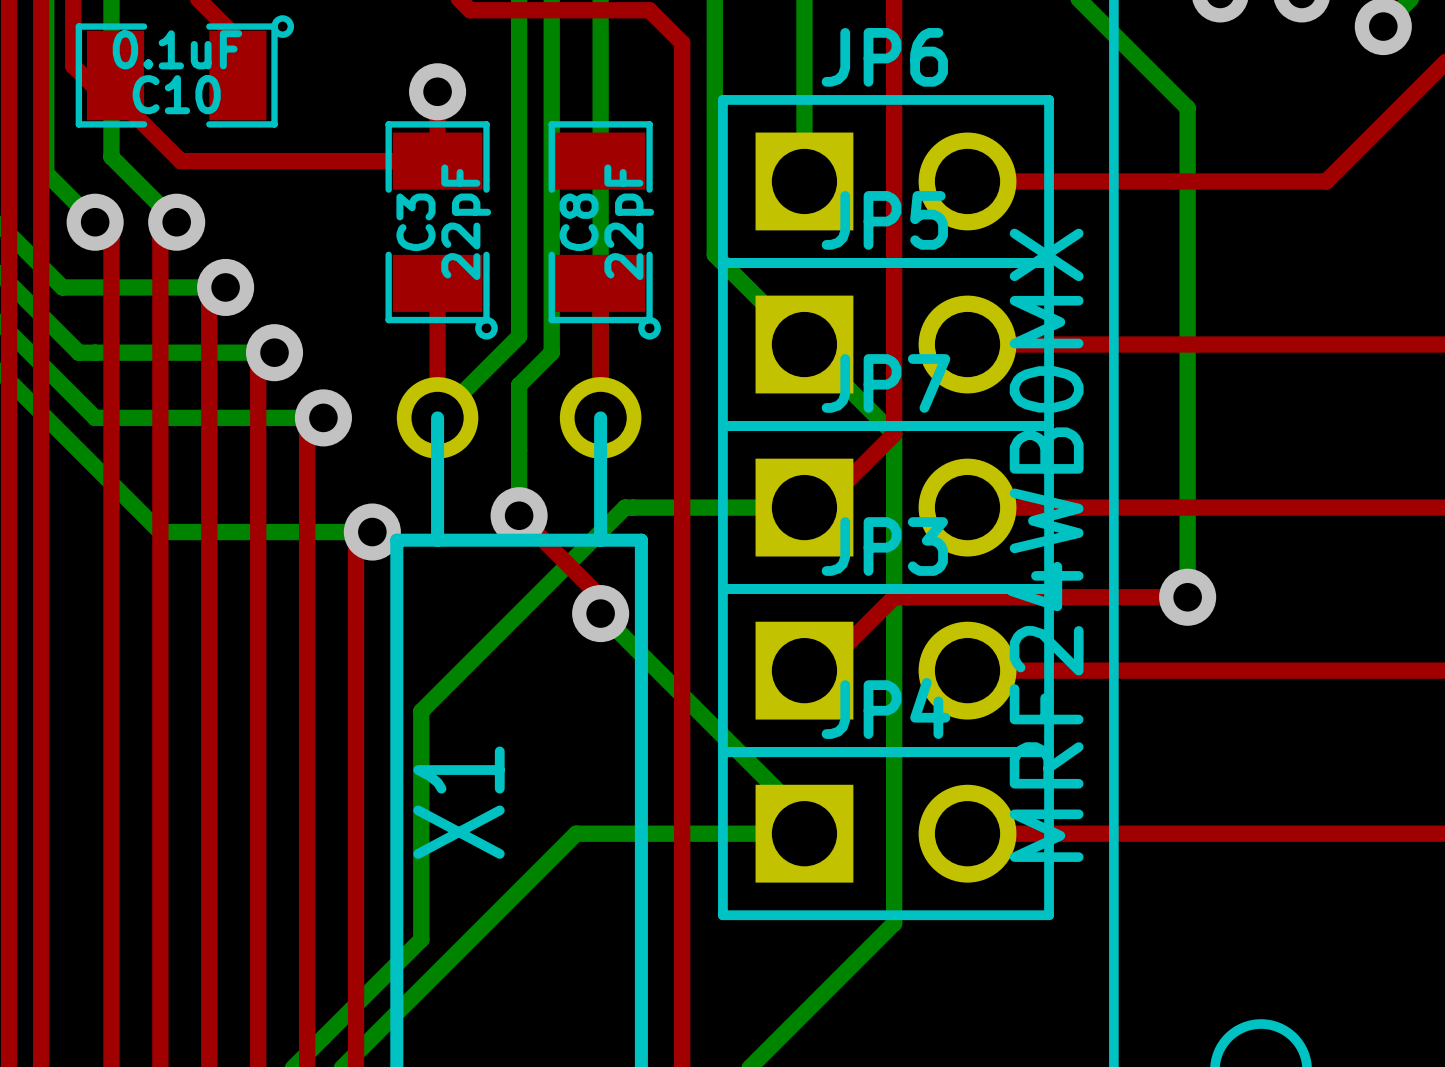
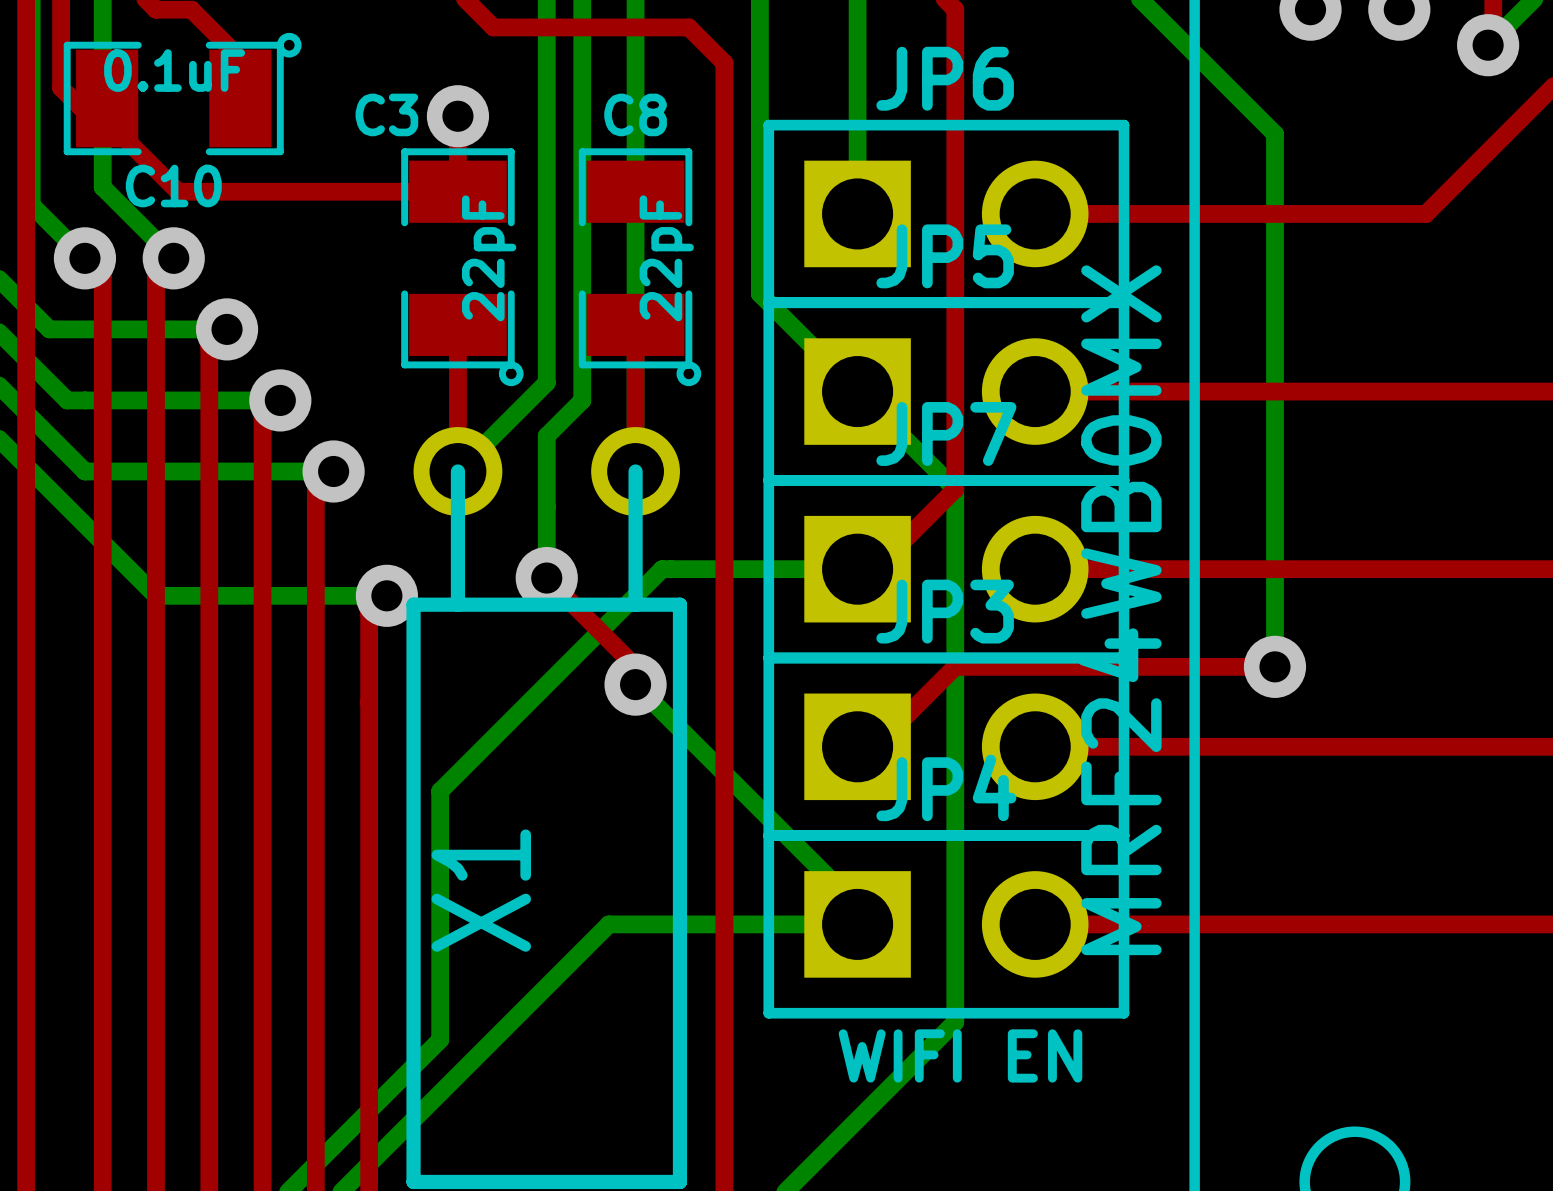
C10 name position: C10 (176, 94) -> C10 (173, 185)
C3 name rotation: 0° (415, 222) -> 90° clockwise (386, 114)
C3 name position: C3 (415, 222) -> C3 (386, 114)
C8 name rotation: 0° (579, 222) -> 90° clockwise (635, 114)
C8 name position: C8 (579, 222) -> C8 (635, 114)
text: none -> WIFI EN (960, 1055)

